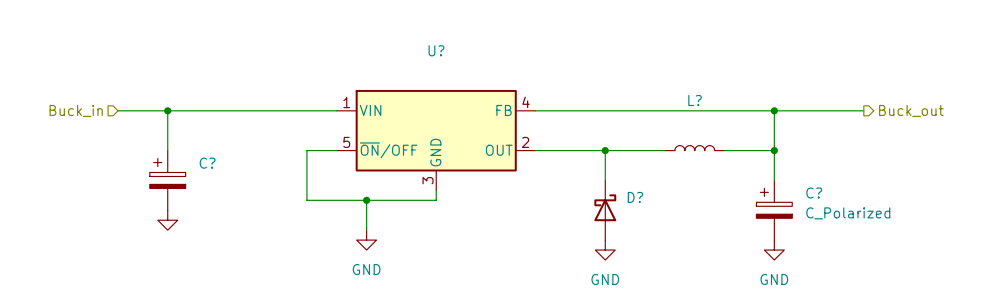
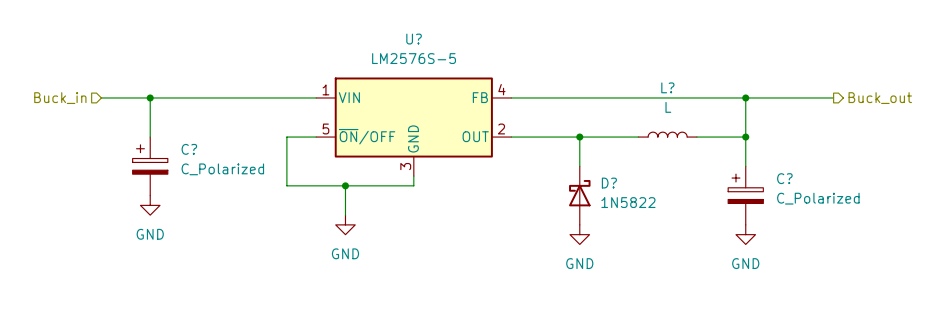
U? value: none -> LM2576S-5 (414, 58)
L? value: none -> L (668, 107)
C? value: none -> C_Polarized (222, 169)
D? value: none -> 1N5822 (628, 202)
power symbol text: none -> GND (150, 234)

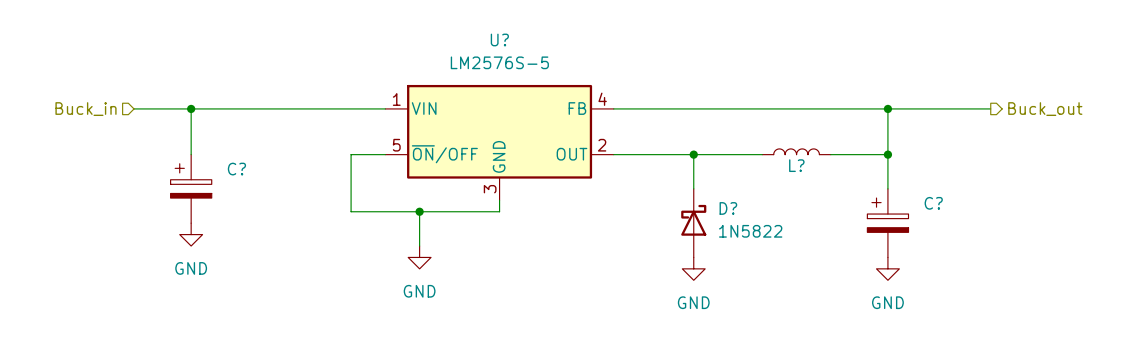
L? name position: L? (667, 87) -> L? (796, 165)
L? value: L (668, 107) -> none
C? value: C_Polarized (222, 169) -> none
C? value: C_Polarized (818, 198) -> none

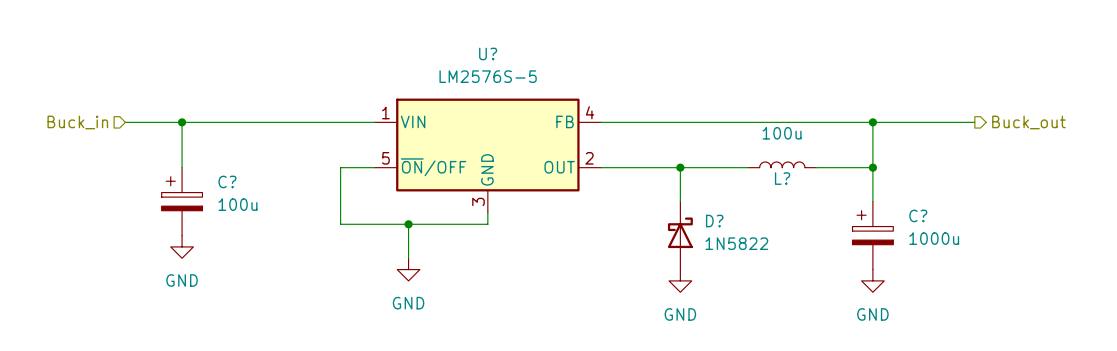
L? value: none -> 100u (782, 133)
C? value: none -> 100u (237, 204)
C? value: none -> 1000u (934, 238)

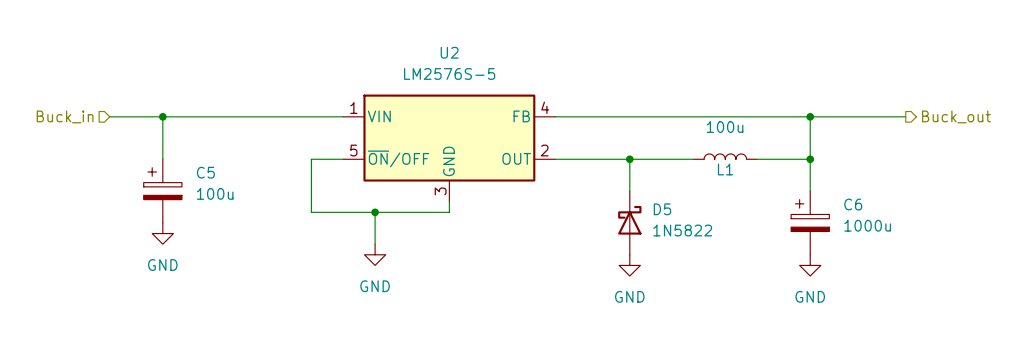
U? name: U? (488, 53) -> U2 (449, 52)
L? name: L? (782, 178) -> L1 (725, 169)
C? name: C? (227, 181) -> C5 (205, 172)
C? name: C? (918, 215) -> C6 (853, 204)
D? name: D? (714, 221) -> D5 (662, 209)

